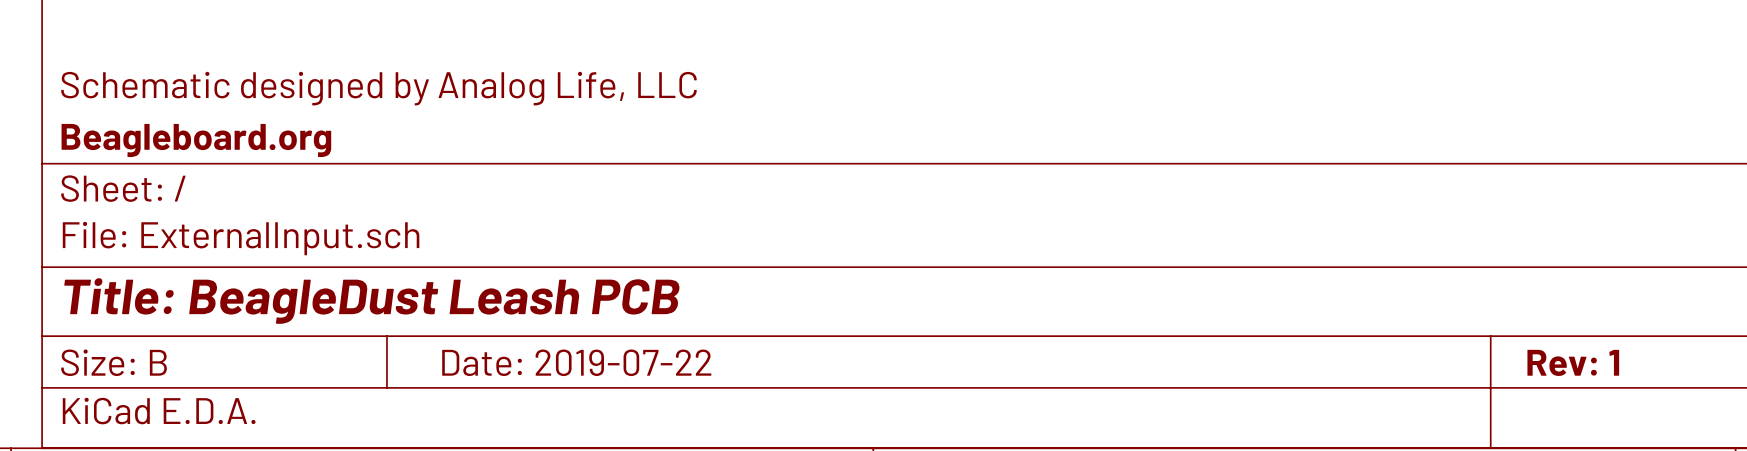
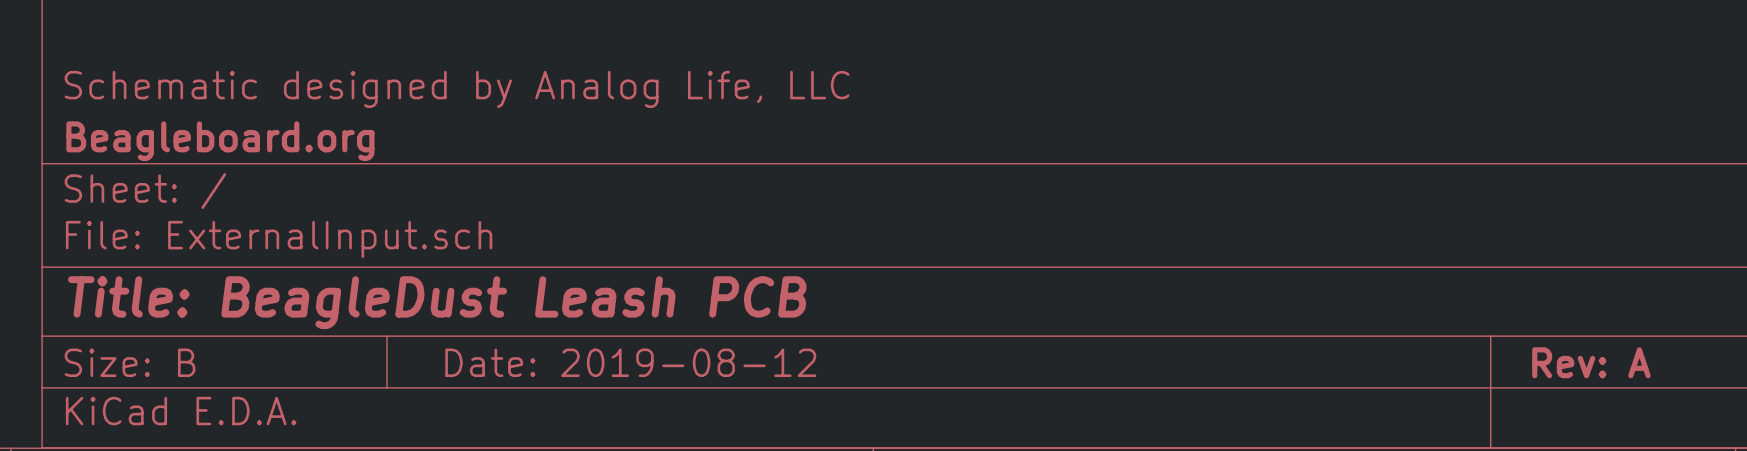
title block: Date: 2019-07-22 (576, 362) -> Date: 2019-08-12 (630, 362)
title block: Rev: 1 (1573, 362) -> Rev: A (1591, 362)

